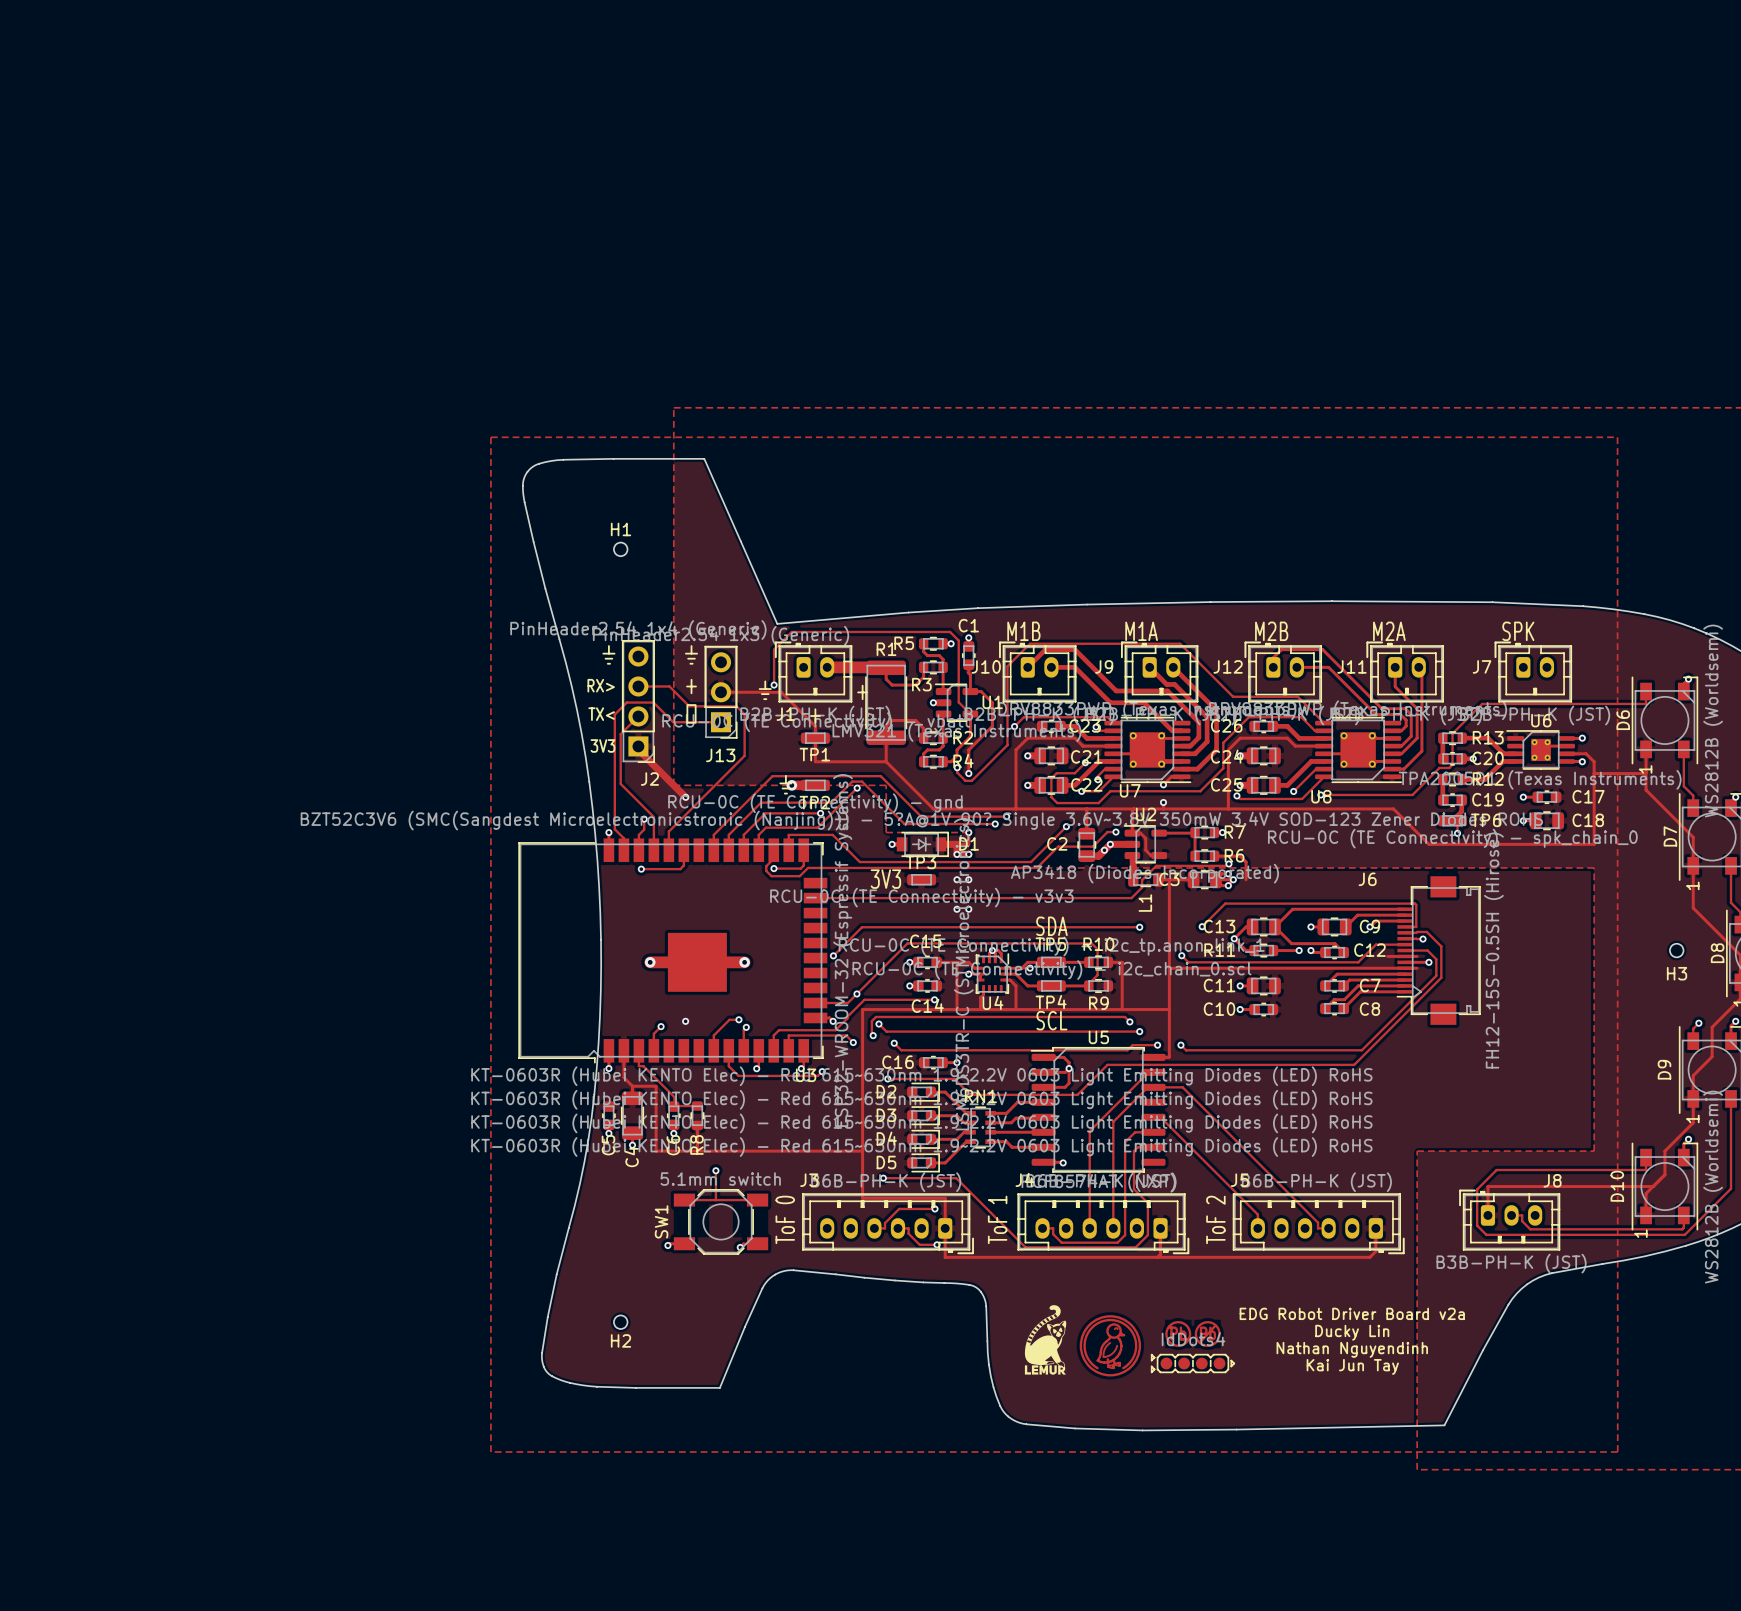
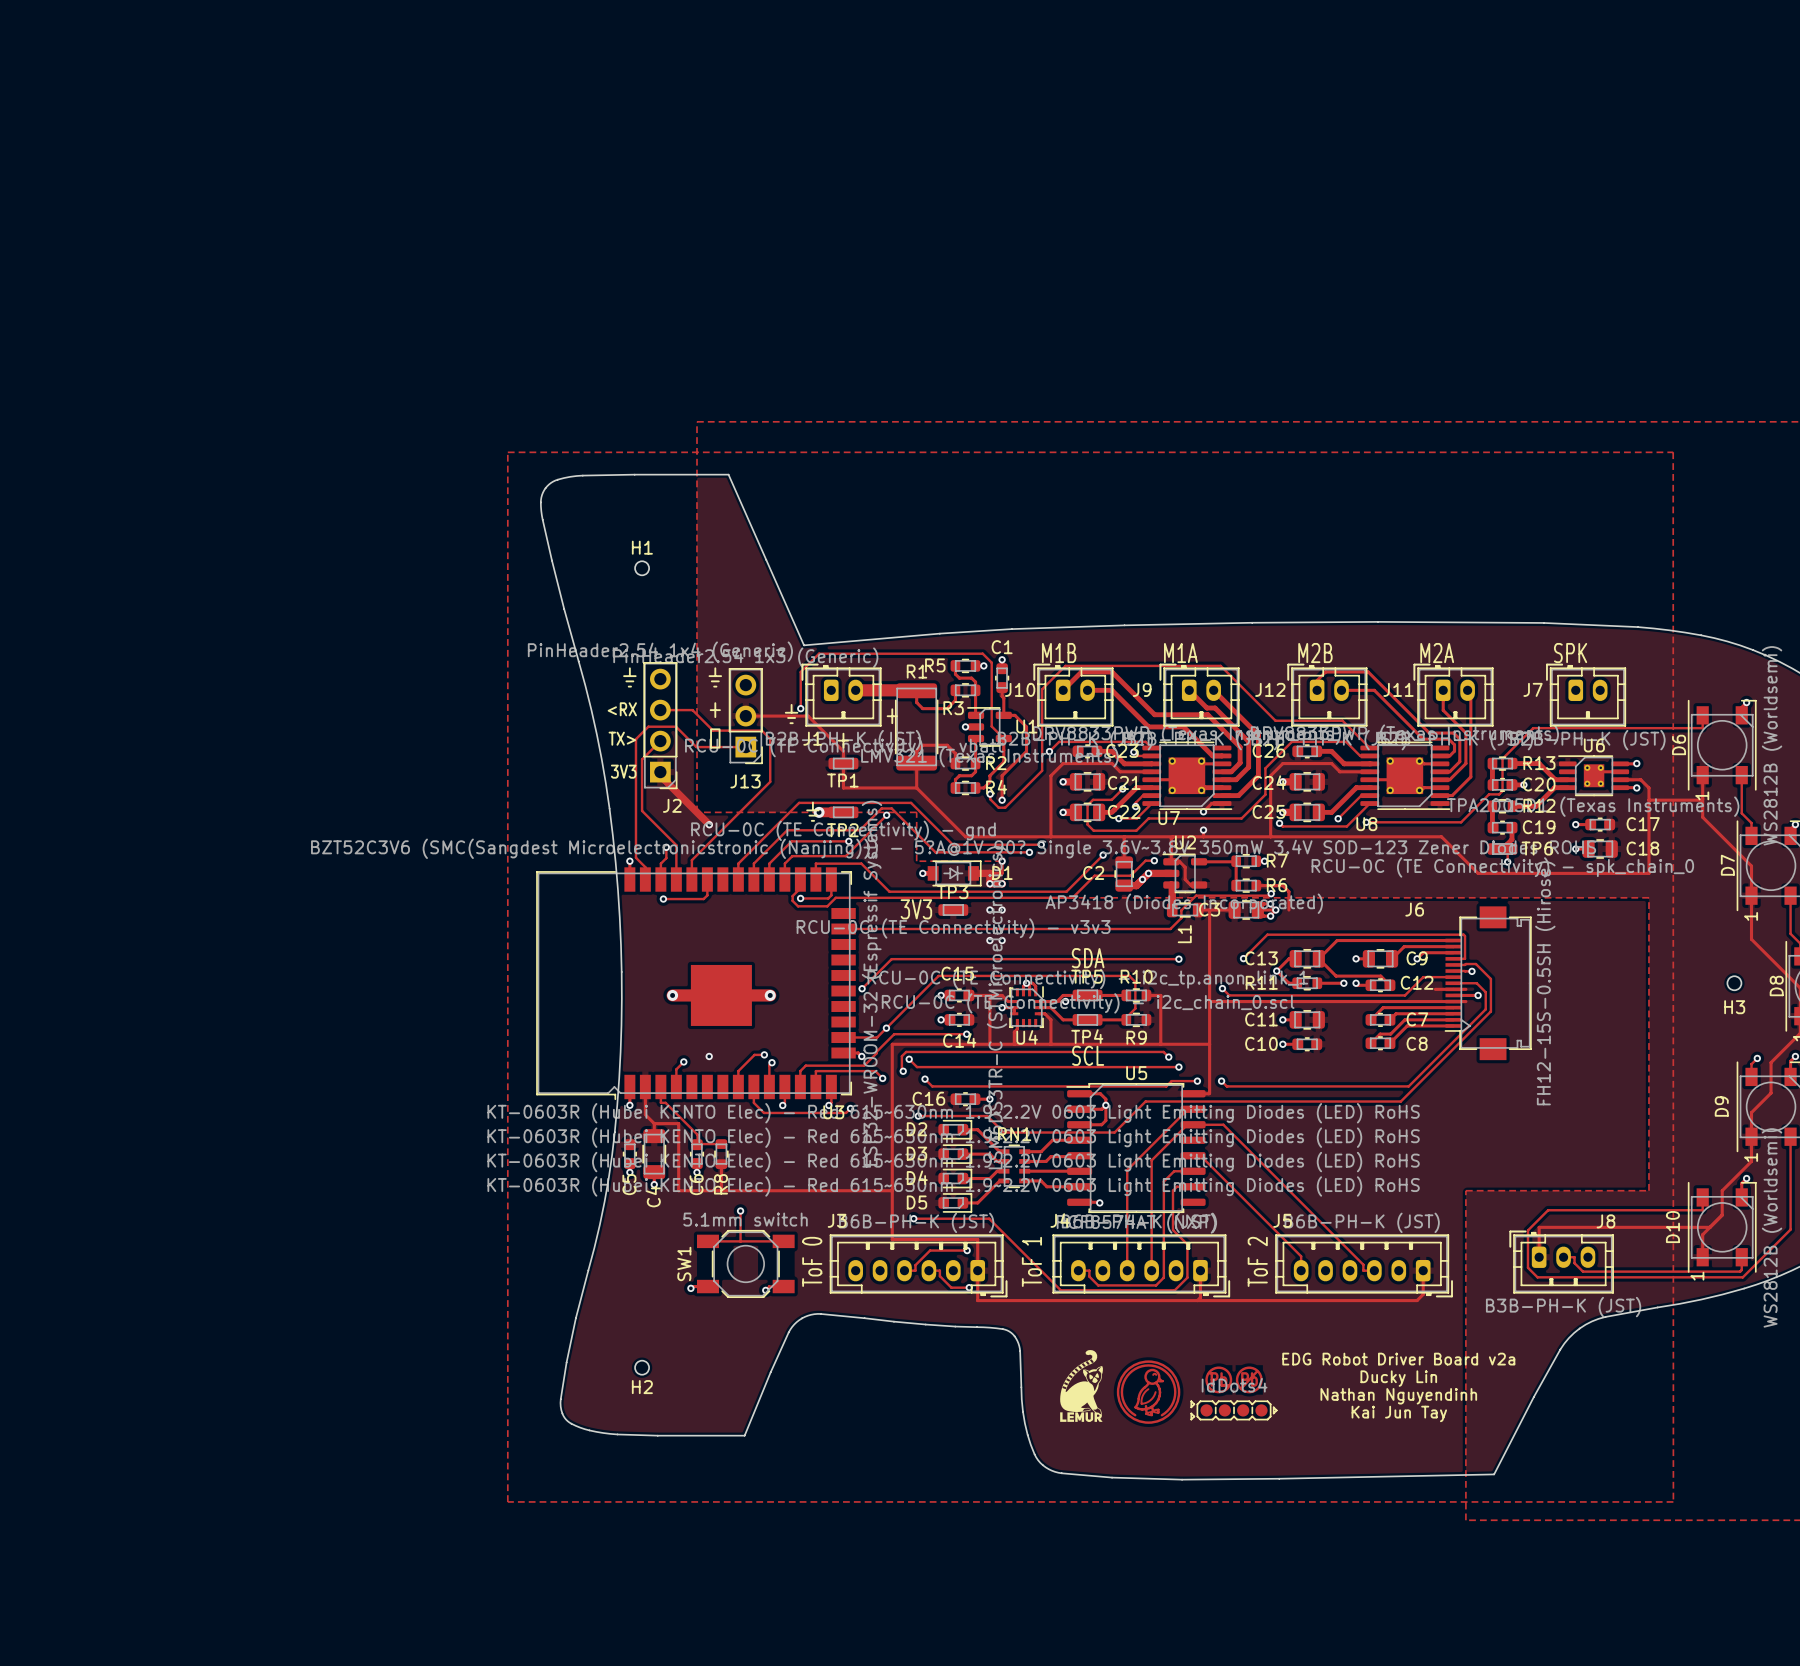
text: RX> (601, 685) -> <RX (622, 709)
text: TX< (601, 714) -> TX> (622, 738)

